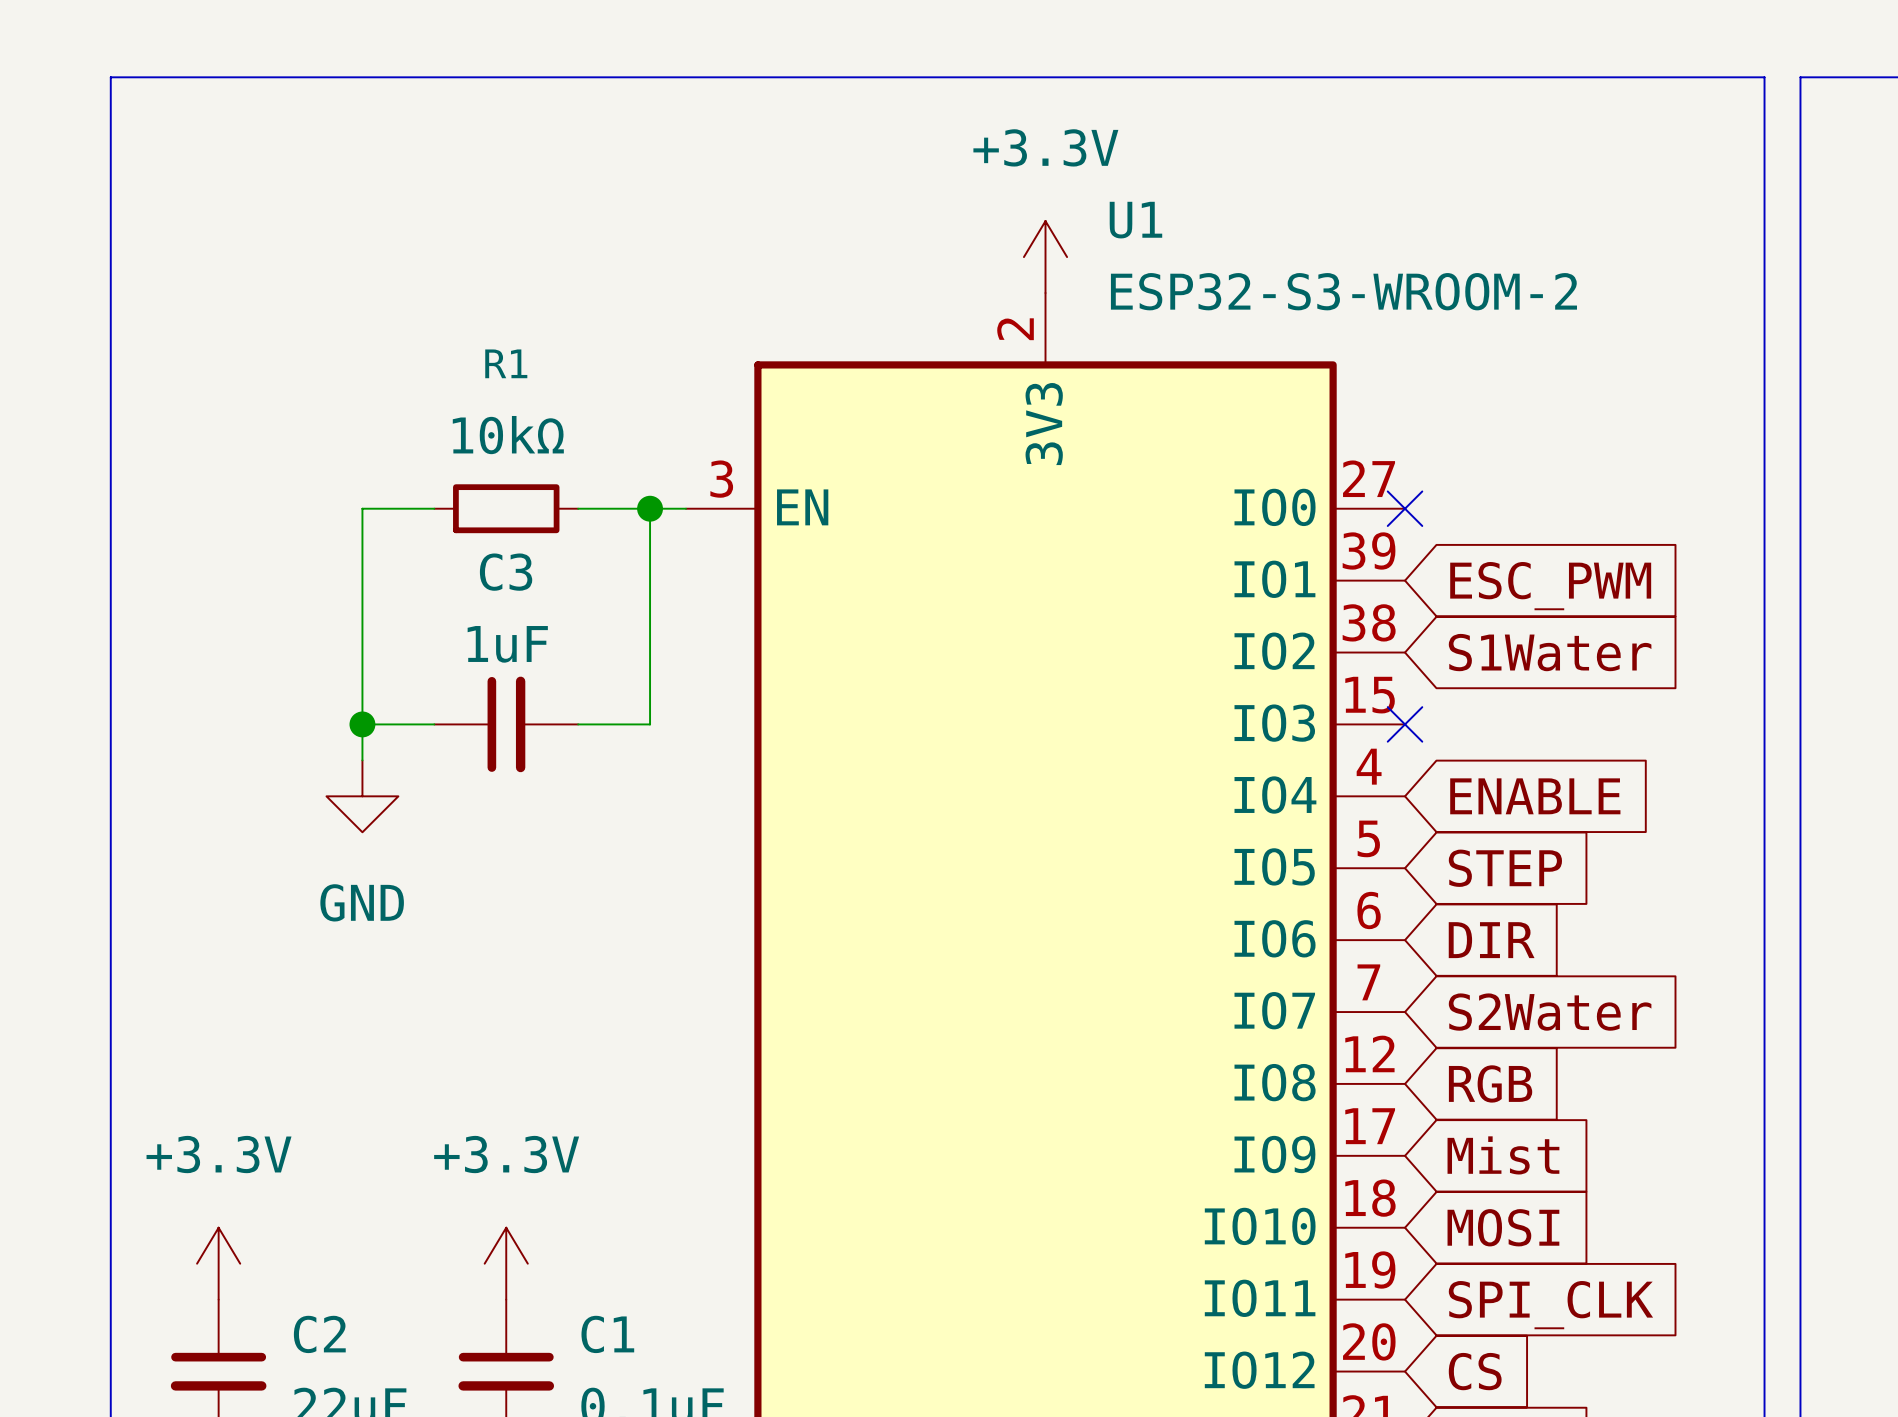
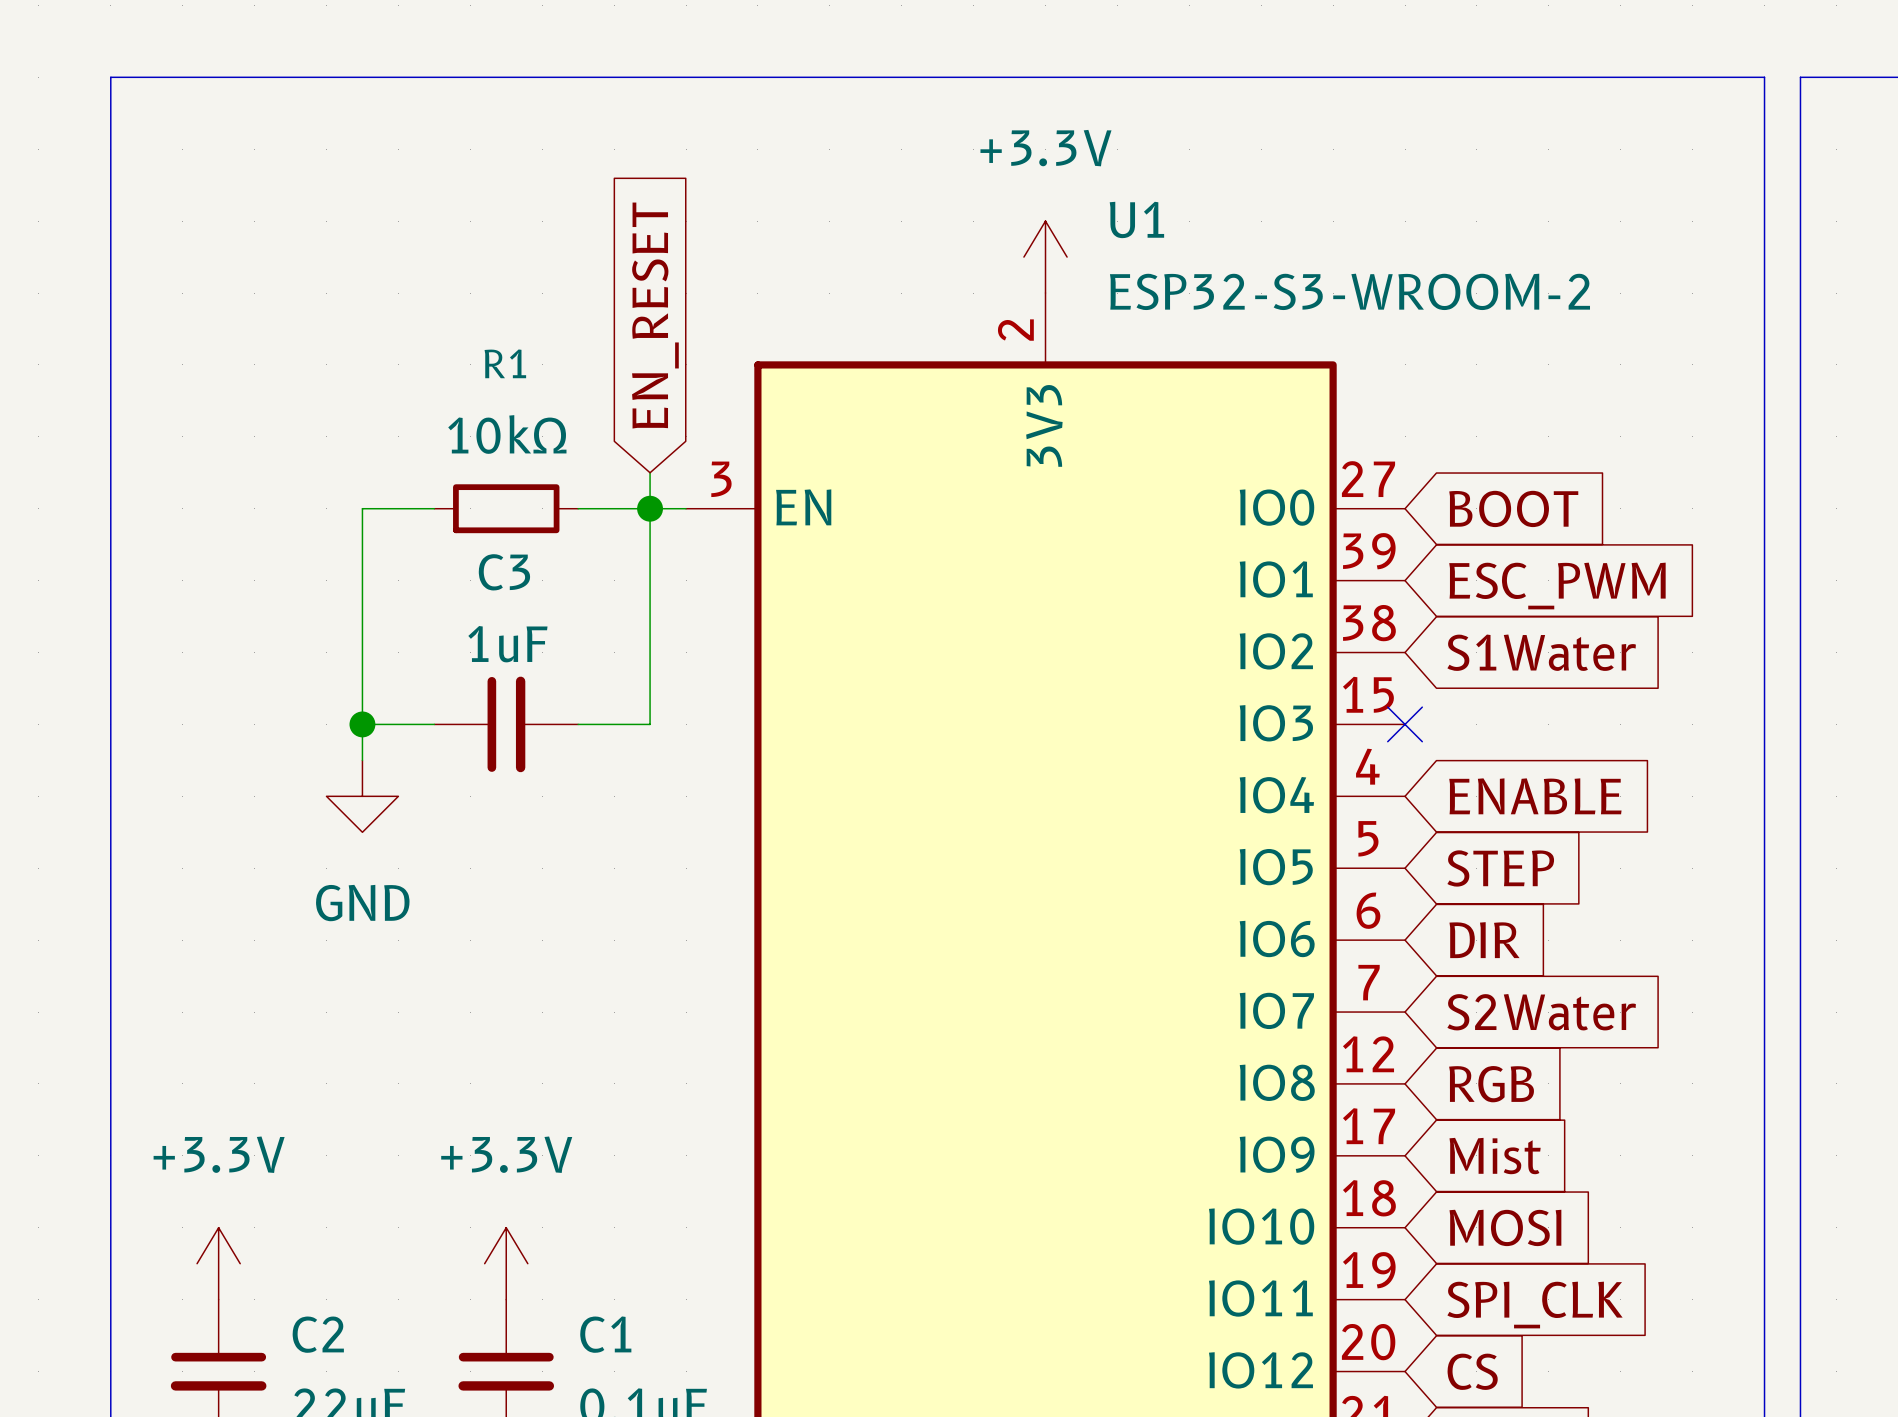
global label: none -> EN_RESET (655, 315)
wire: none -> (650, 472) (650, 508)
no-connect mark: (1405, 508) -> none
global label: none -> BOOT (1513, 508)

